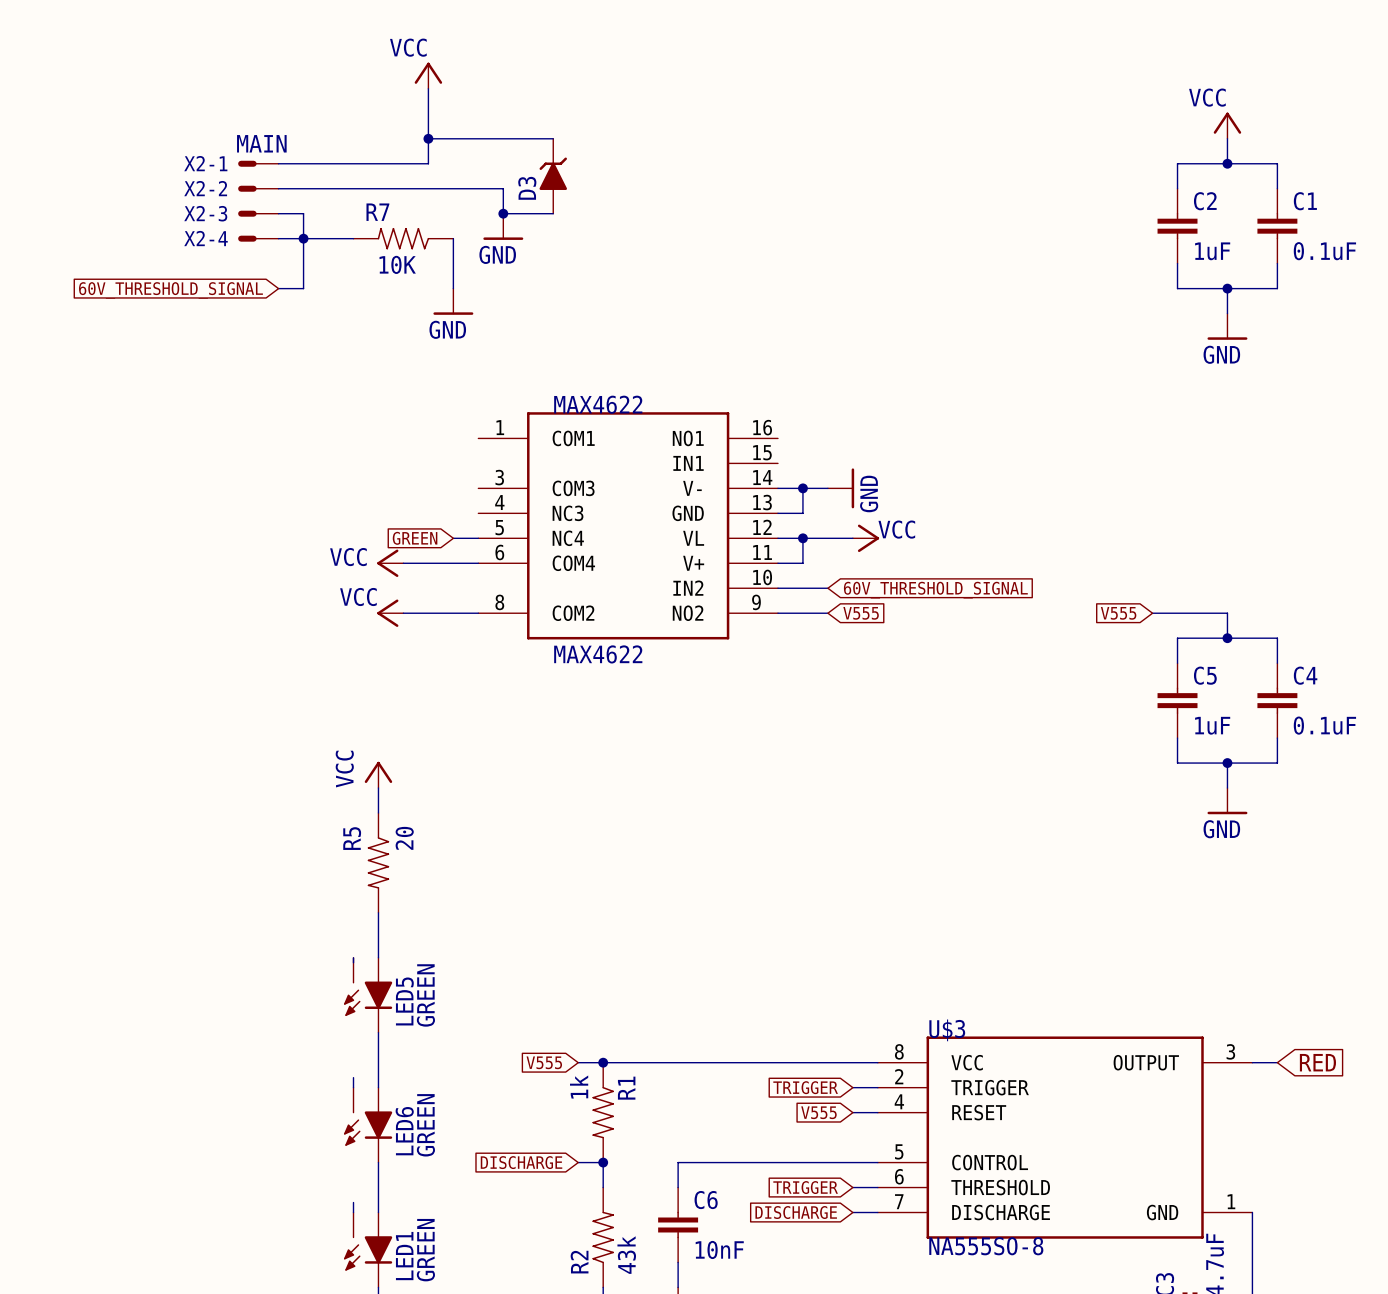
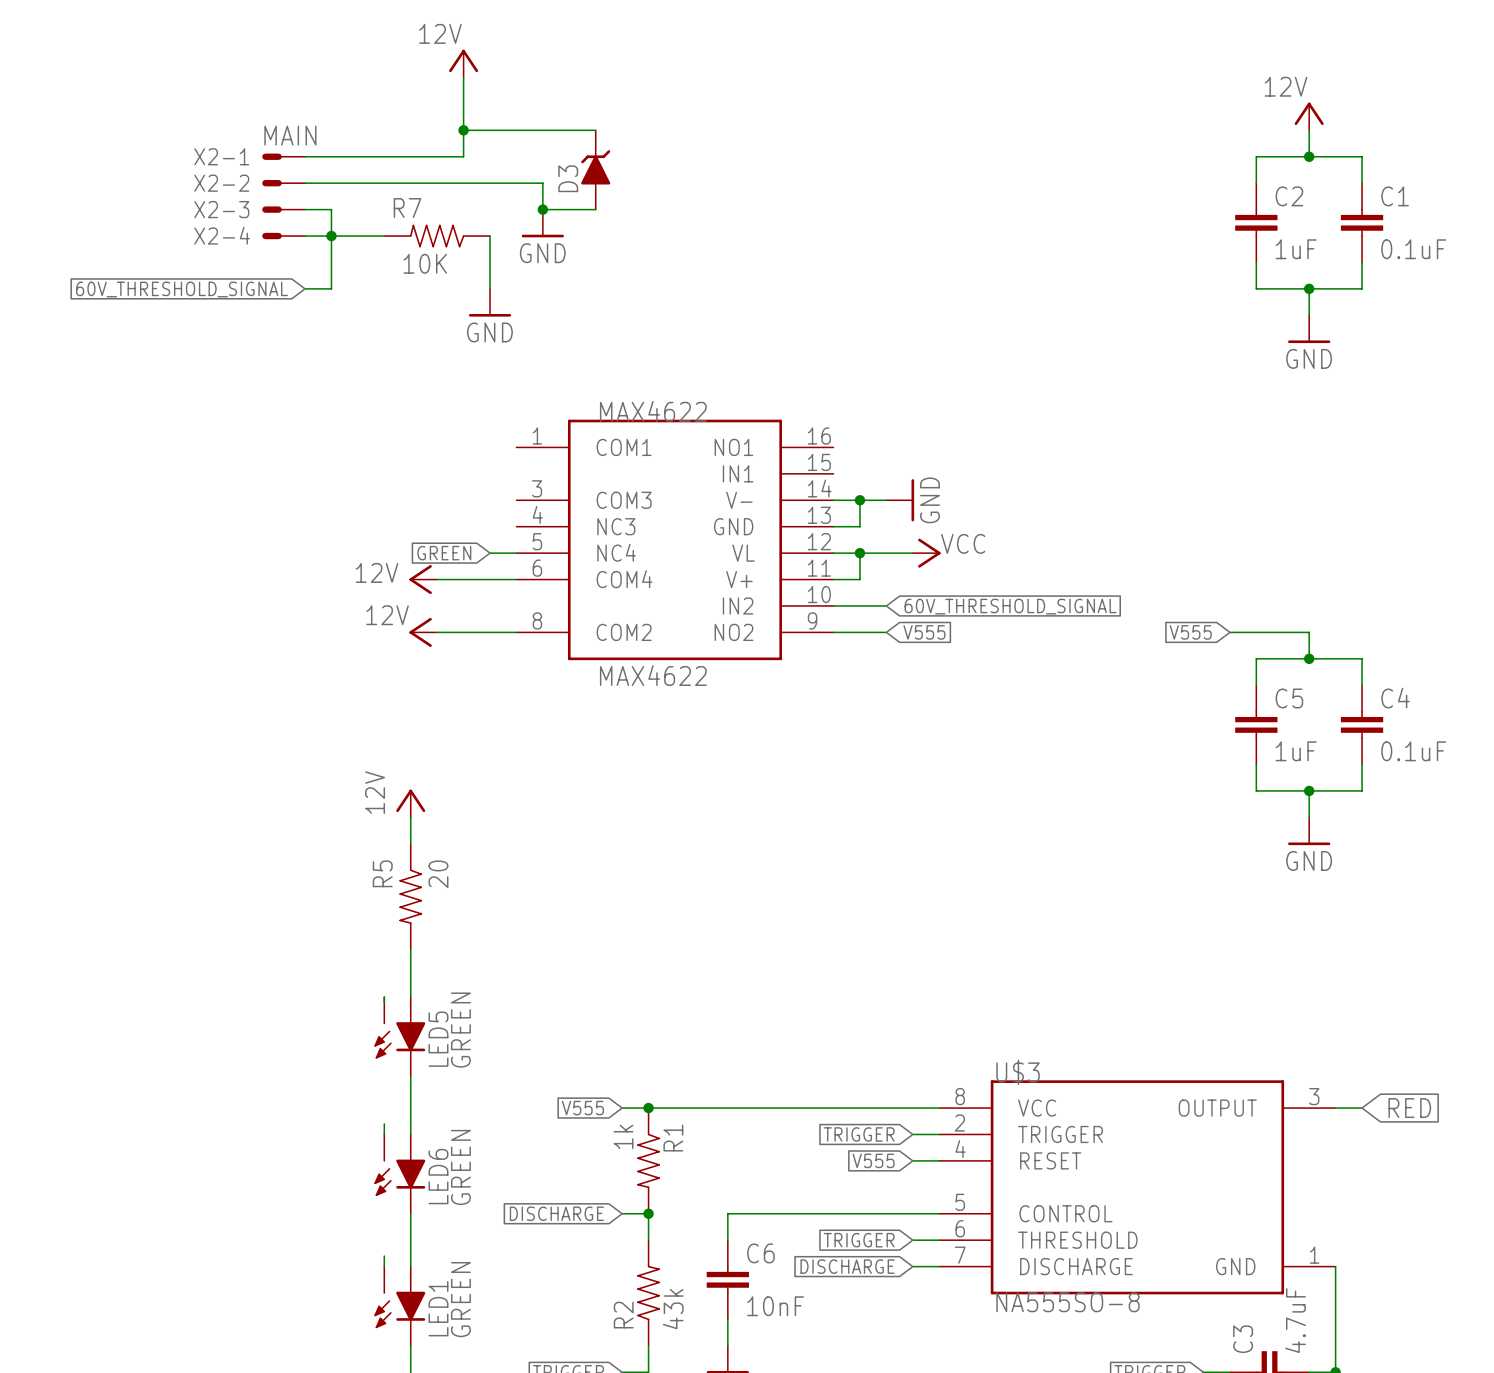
power symbol: VCC (428, 75) -> 12V (463, 63)
power symbol: VCC (1227, 125) -> 12V (1309, 116)
power symbol: VCC (390, 563) -> 12V (423, 579)
power symbol: VCC (390, 613) -> 12V (423, 632)
power symbol: VCC (378, 774) -> 12V (410, 803)

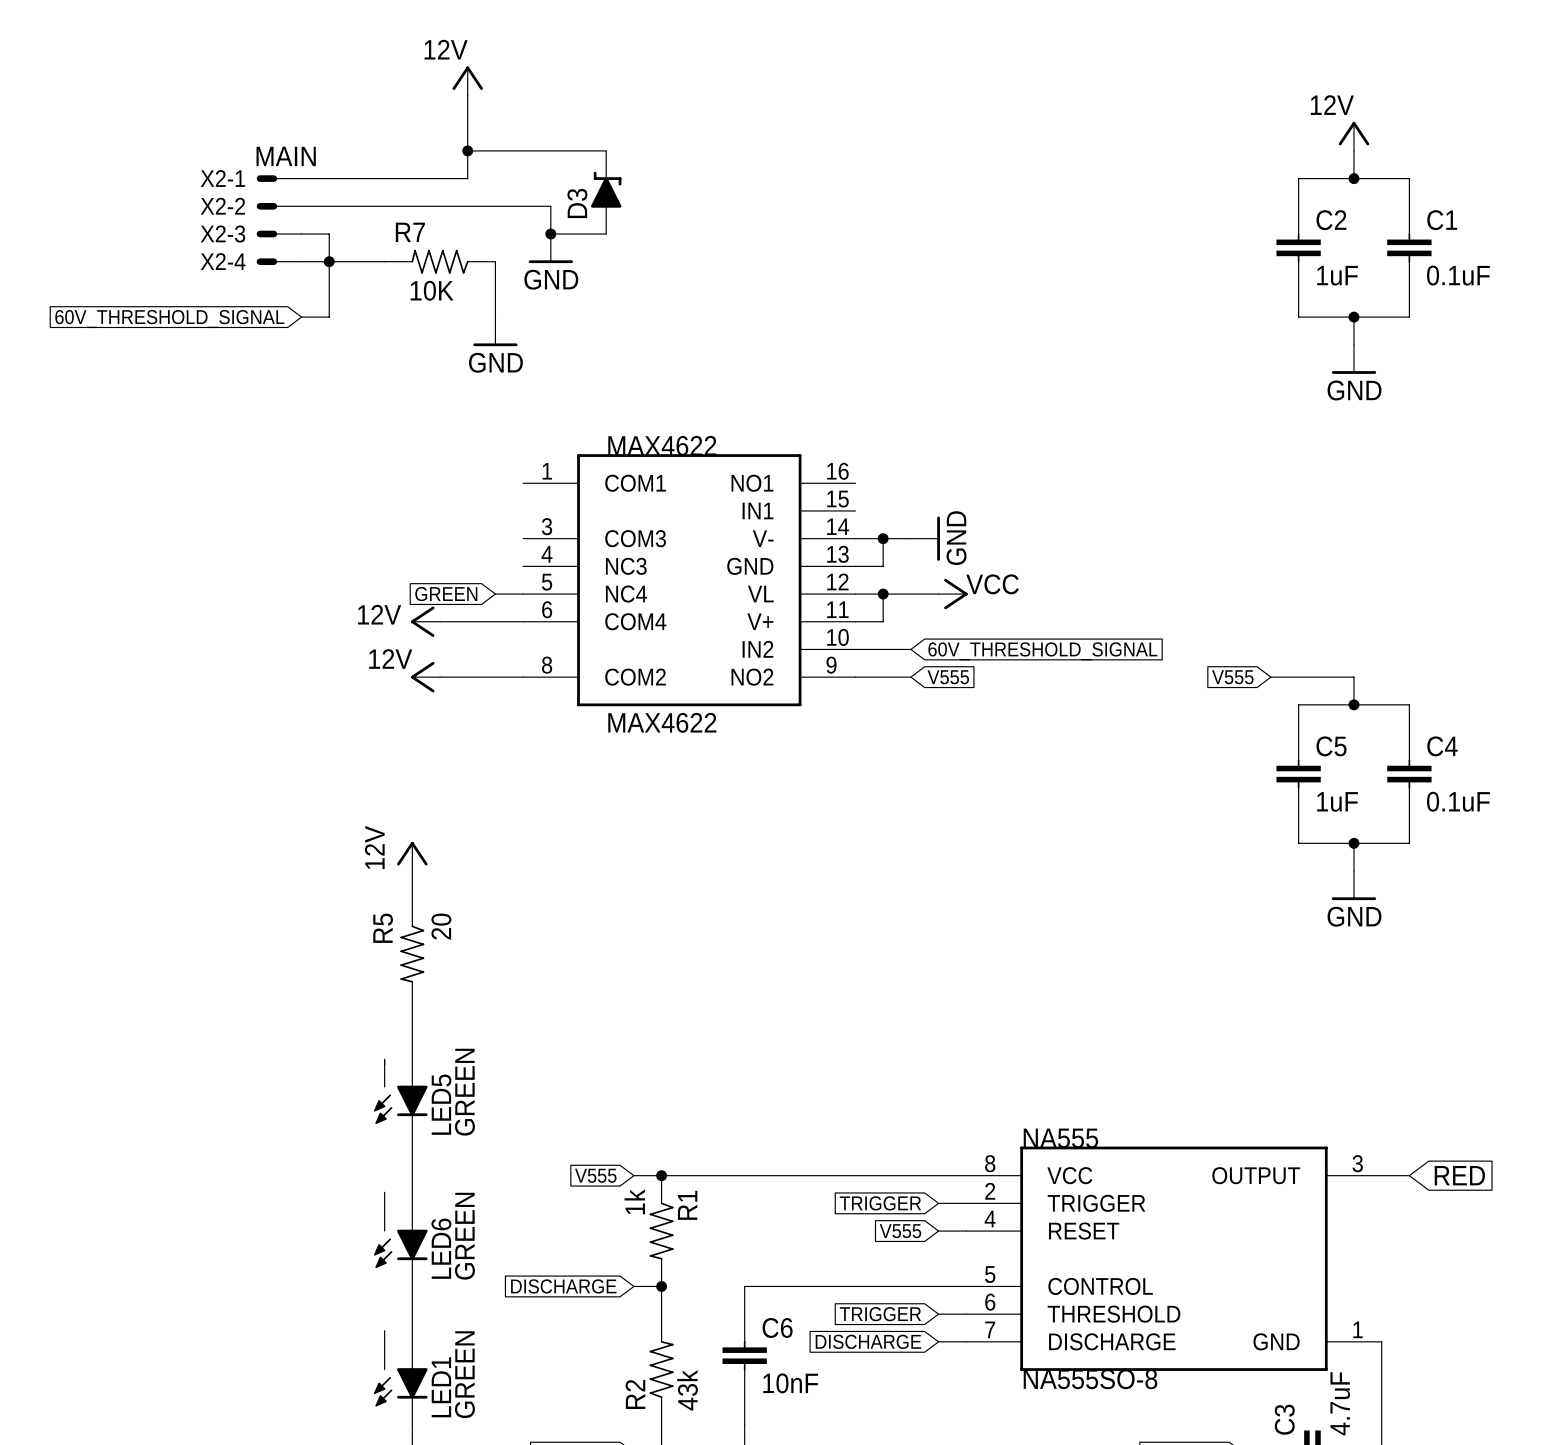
D3 symbol: [581, 130, 611, 210] -> [590, 150, 622, 235]
U$3 name: U$3 (1018, 1072) -> NA555 (1060, 1138)

